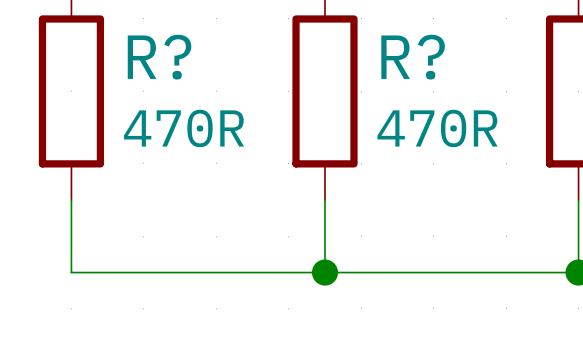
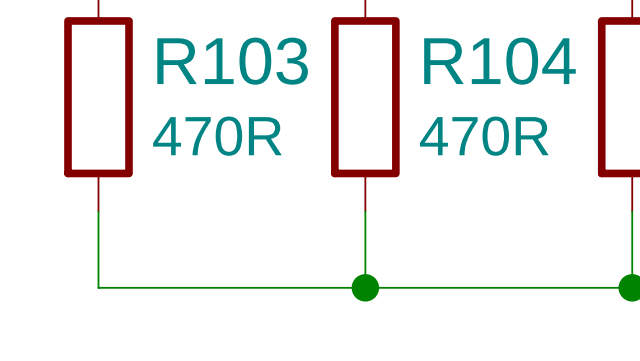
R? name: R? (159, 57) -> R103 (232, 61)
R? name: R? (413, 57) -> R104 (499, 61)

